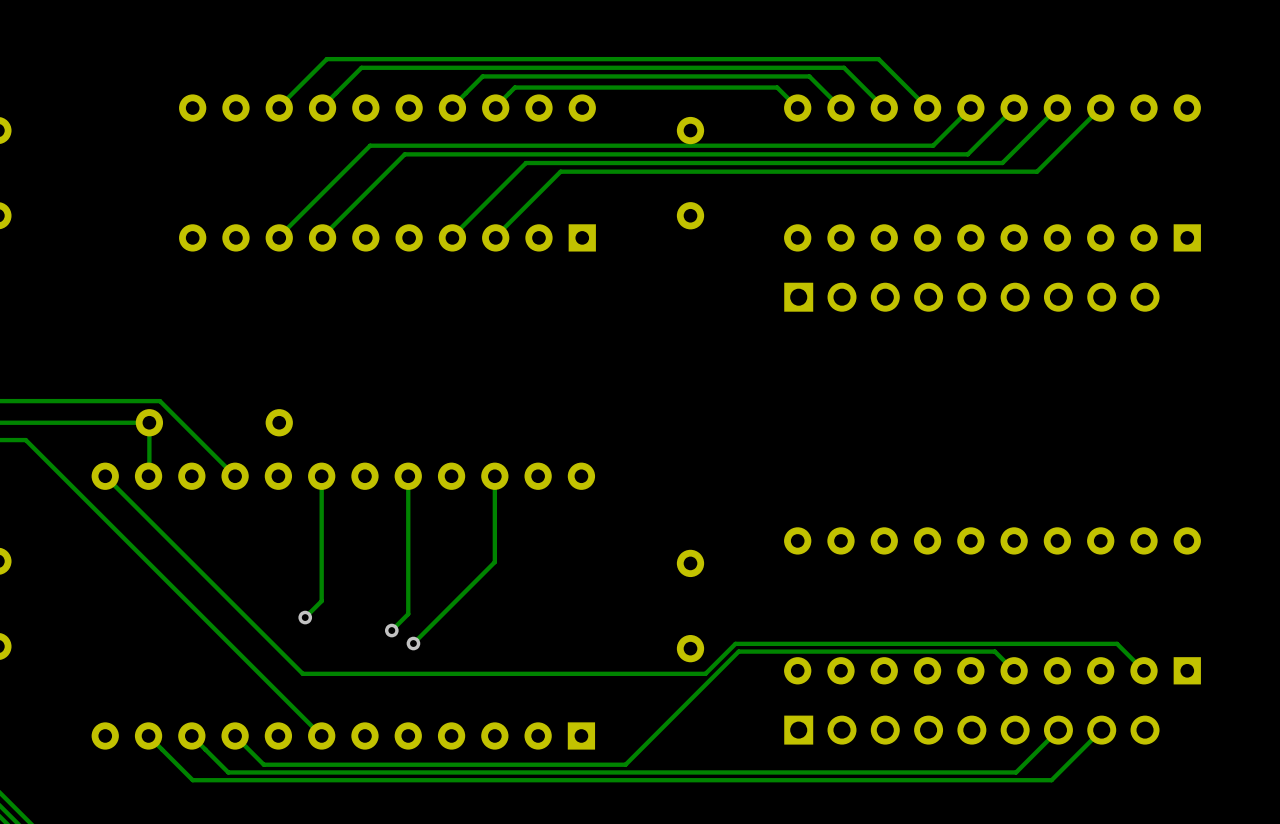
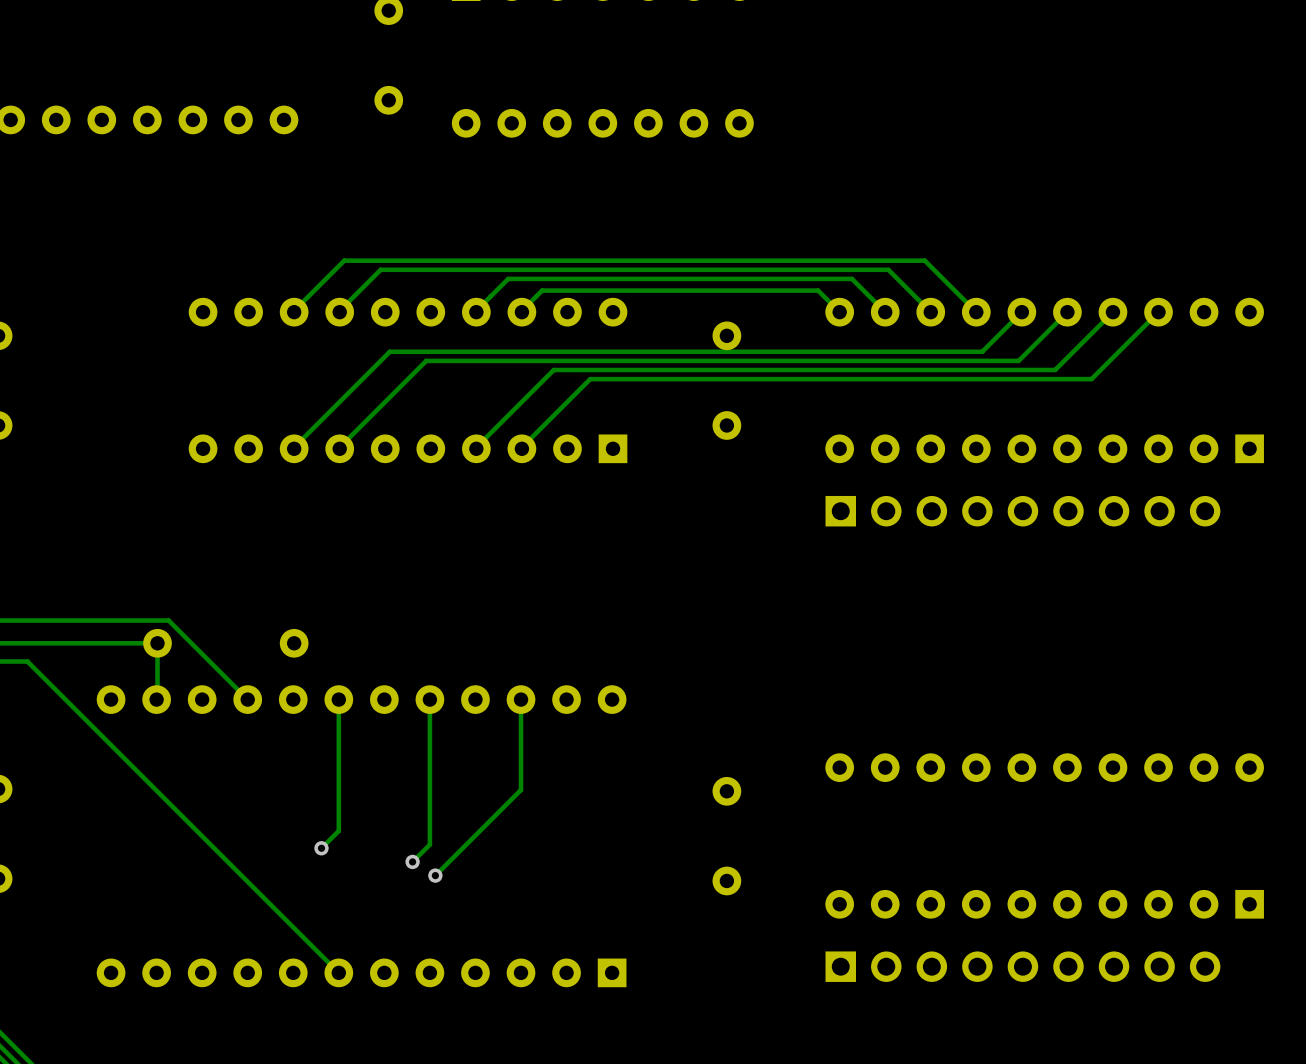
track: (105, 476) (302, 673) (705, 673) (735, 643) (1117, 643) (1144, 670) -> none
track: (1014, 670) (994, 651) (738, 651) (625, 764) (263, 764) (235, 735) -> none
track: (1058, 730) (1016, 772) (228, 772) (191, 735) -> none
track: (1101, 730) (1051, 780) (192, 780) (148, 735) -> none

